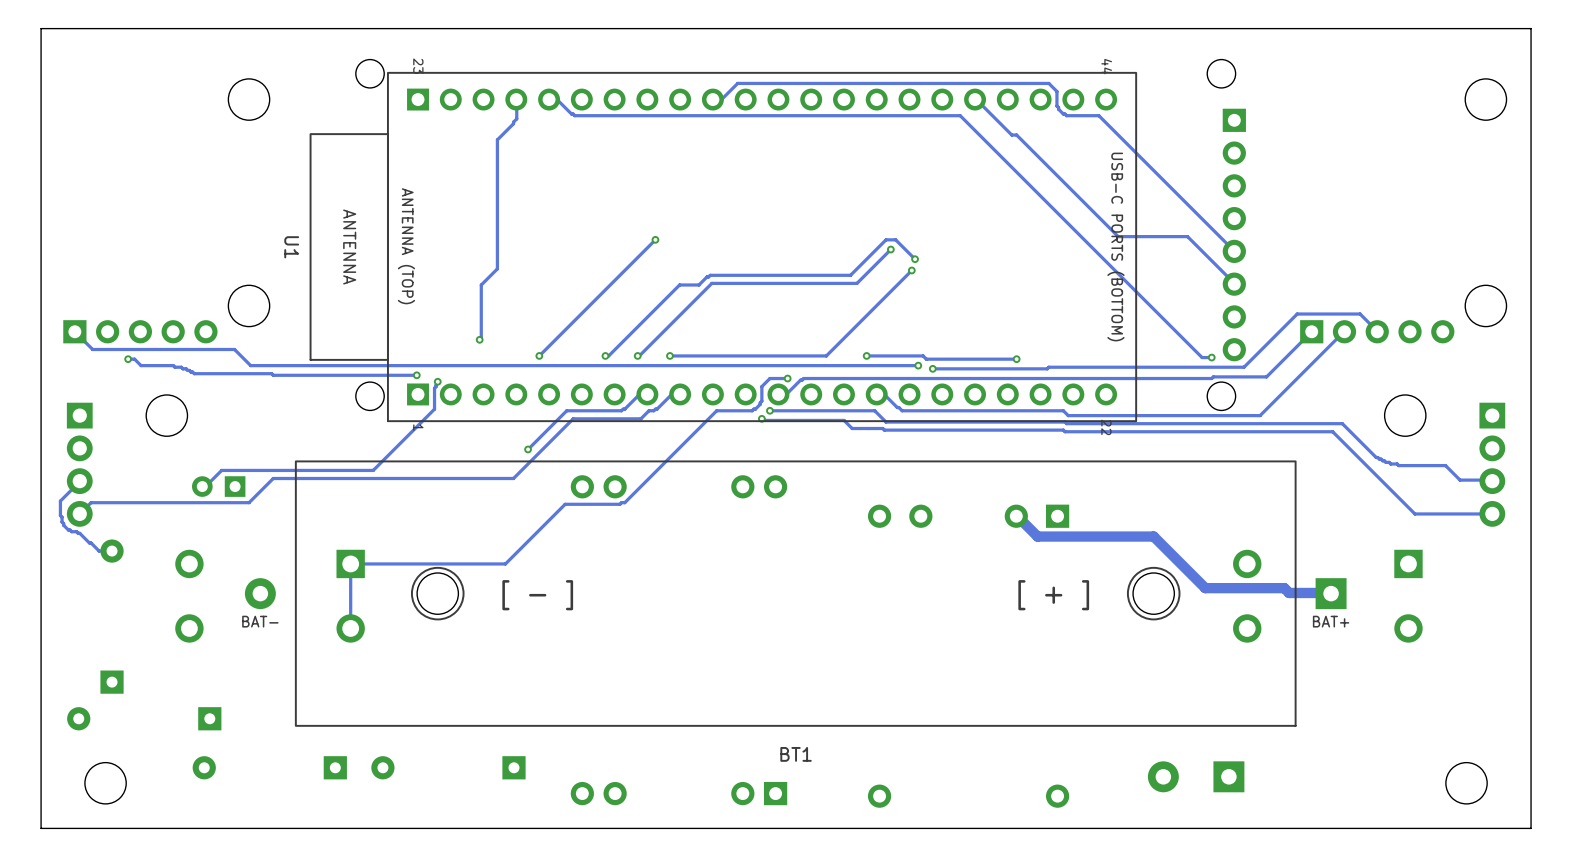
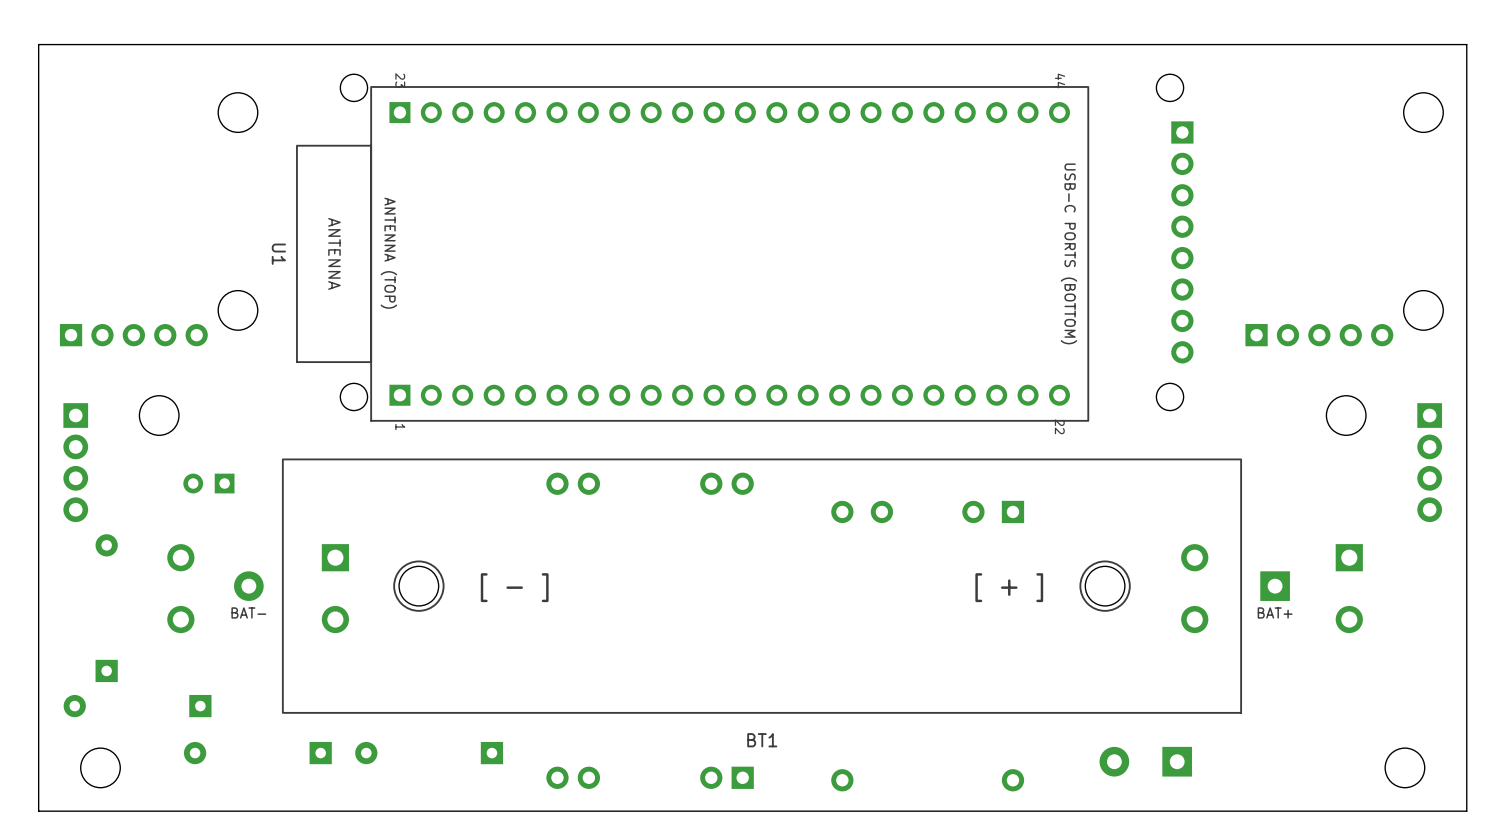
track: (516, 99) (516, 118) (497, 139) (497, 268) (481, 284) (481, 338) (479, 339) -> none
track: (549, 99) (557, 99) (574, 115) (960, 115) (1202, 357) (1211, 357) -> none
track: (712, 99) (721, 99) (737, 83) (1048, 83) (1056, 91) (1056, 106) (1063, 114) (1098, 115) (1234, 251) -> none
track: (974, 99) (1011, 135) (1016, 135) (1118, 236) (1187, 236) (1234, 284) -> none
track: (655, 239) (539, 355) -> none
via: (655, 239) -> none
track: (890, 249) (857, 283) (711, 283) (637, 355) -> none
via: (890, 249) -> none
track: (915, 259) (895, 239) (886, 239) (850, 275) (710, 275) (698, 284) (679, 284) (608, 355) (605, 355) -> none
via: (915, 259) -> none
track: (911, 270) (826, 355) (669, 355) -> none
via: (911, 270) -> none
track: (74, 331) (92, 349) (234, 349) (250, 365) (918, 365) -> none
track: (1311, 331) (1266, 376) (803, 378) (786, 394) (778, 394) -> none
track: (1344, 331) (1260, 415) (1068, 415) (1063, 410) (902, 410) (884, 394) (876, 394) -> none
track: (1377, 331) (1360, 314) (1297, 314) (1244, 367) (932, 368) -> none
via: (479, 339) -> none
via: (539, 355) -> none
via: (605, 355) -> none
via: (637, 355) -> none
via: (669, 355) -> none
track: (866, 355) (923, 355) (926, 359) (1016, 359) -> none
via: (866, 355) -> none
via: (1211, 357) -> none
track: (128, 359) (134, 359) (141, 365) (173, 365) (186, 368) (194, 373) (416, 375) -> none
via: (128, 359) -> none
via: (1016, 359) -> none
via: (918, 365) -> none
via: (932, 368) -> none
via: (416, 375) -> none
track: (787, 378) (769, 378) (761, 386) (760, 404) (752, 410) (716, 410) (624, 502) (565, 504) (505, 563) (350, 563) (350, 628) -> none
via: (787, 378) -> none
track: (437, 381) (434, 388) (434, 409) (373, 470) (221, 470) (205, 486) (202, 486) -> none
via: (437, 381) -> none
track: (647, 394) (639, 394) (621, 410) (566, 410) (528, 449) -> none
track: (680, 394) (671, 394) (657, 409) (648, 410) (640, 418) (573, 418) (513, 478) (273, 478) (249, 502) (91, 502) (79, 513) -> none
track: (769, 410) (874, 410) (886, 422) (1342, 423) (1376, 457) (1385, 462) (1398, 465) (1445, 465) (1460, 480) (1492, 481) -> none
via: (769, 410) -> none
track: (761, 418) (765, 420) (844, 420) (852, 428) (882, 428) (884, 430) (1332, 431) (1414, 513) (1492, 513) -> none
via: (761, 418) -> none
via: (528, 449) -> none
track: (79, 481) (60, 501) (62, 522) (68, 530) (79, 533) (99, 551) (112, 551) -> none
track: (1016, 516) (1037, 536) (1153, 536) (1205, 588) (1284, 588) (1289, 592) (1331, 593) -> none

